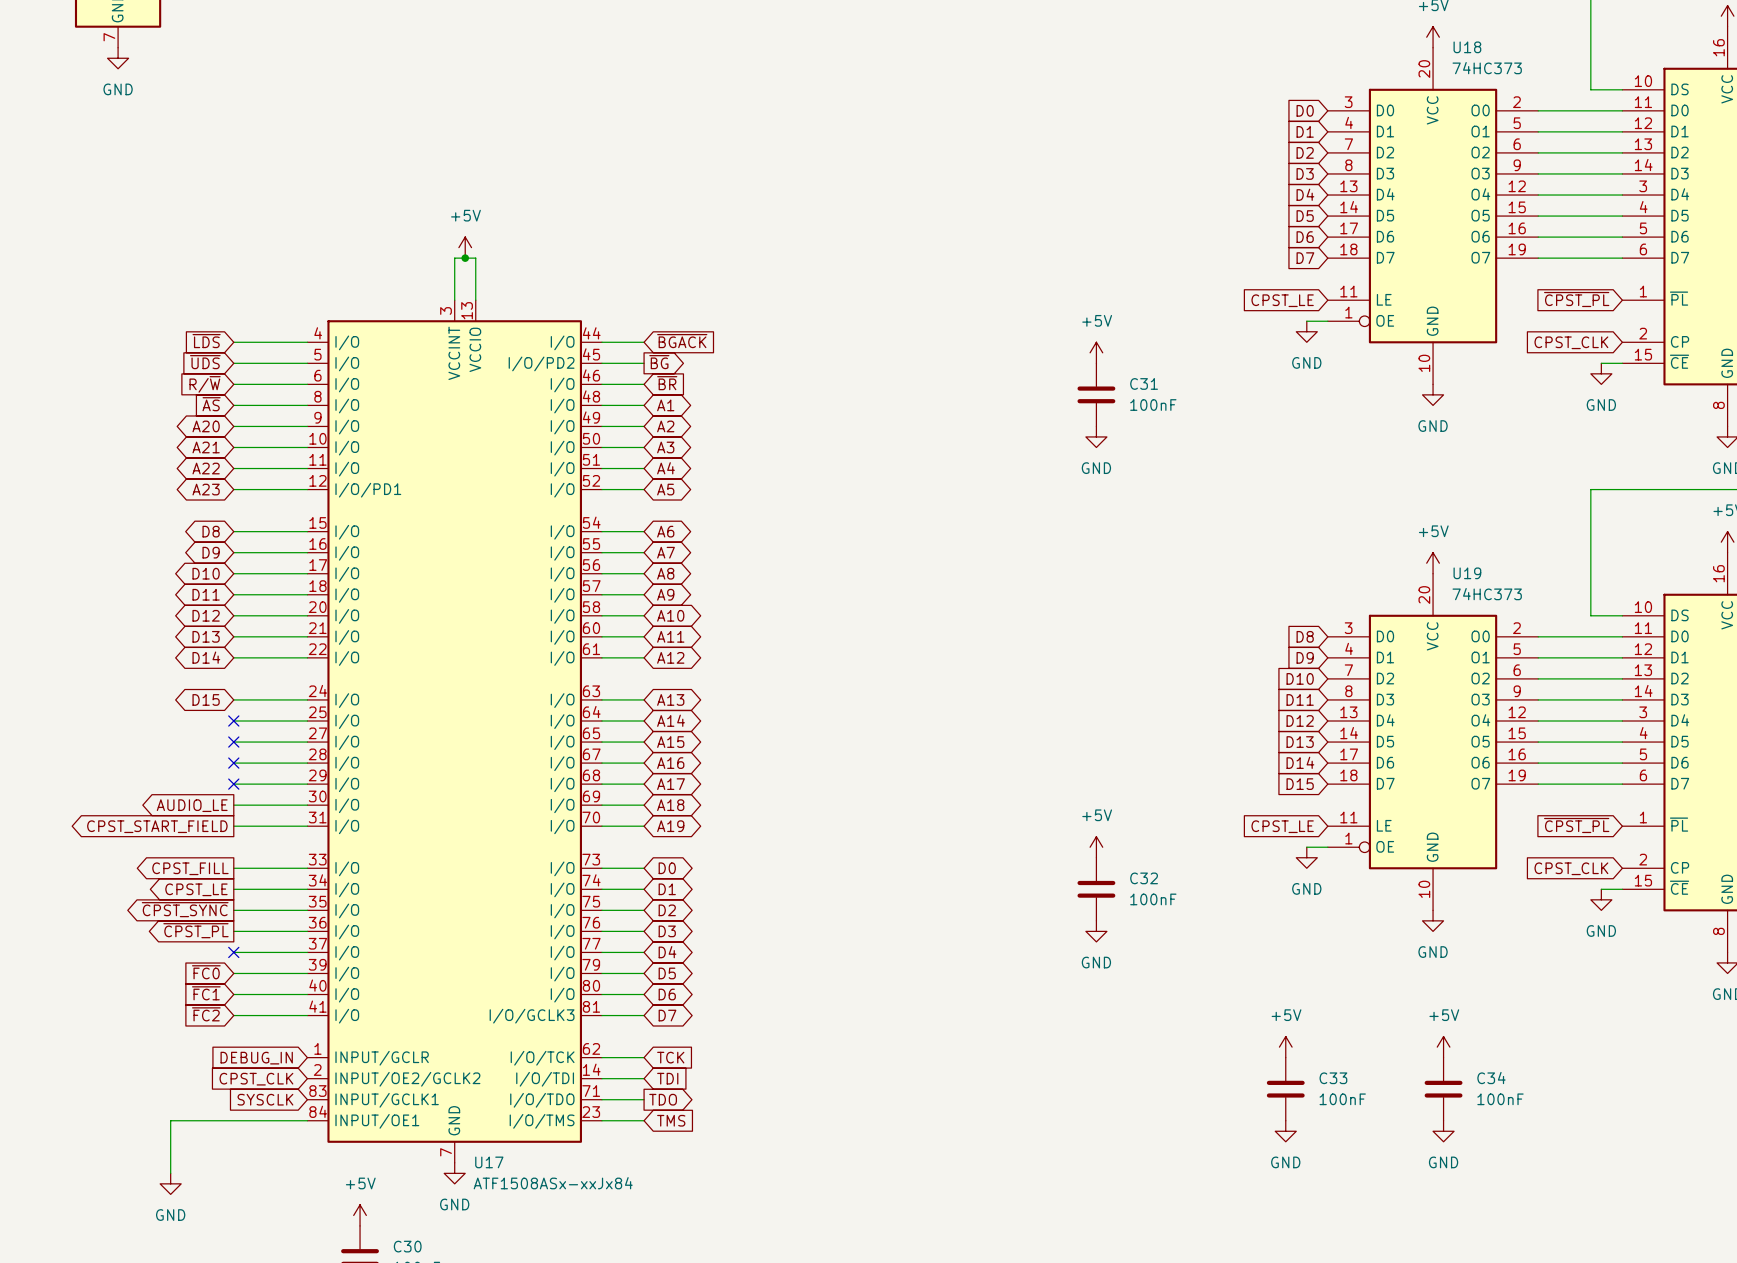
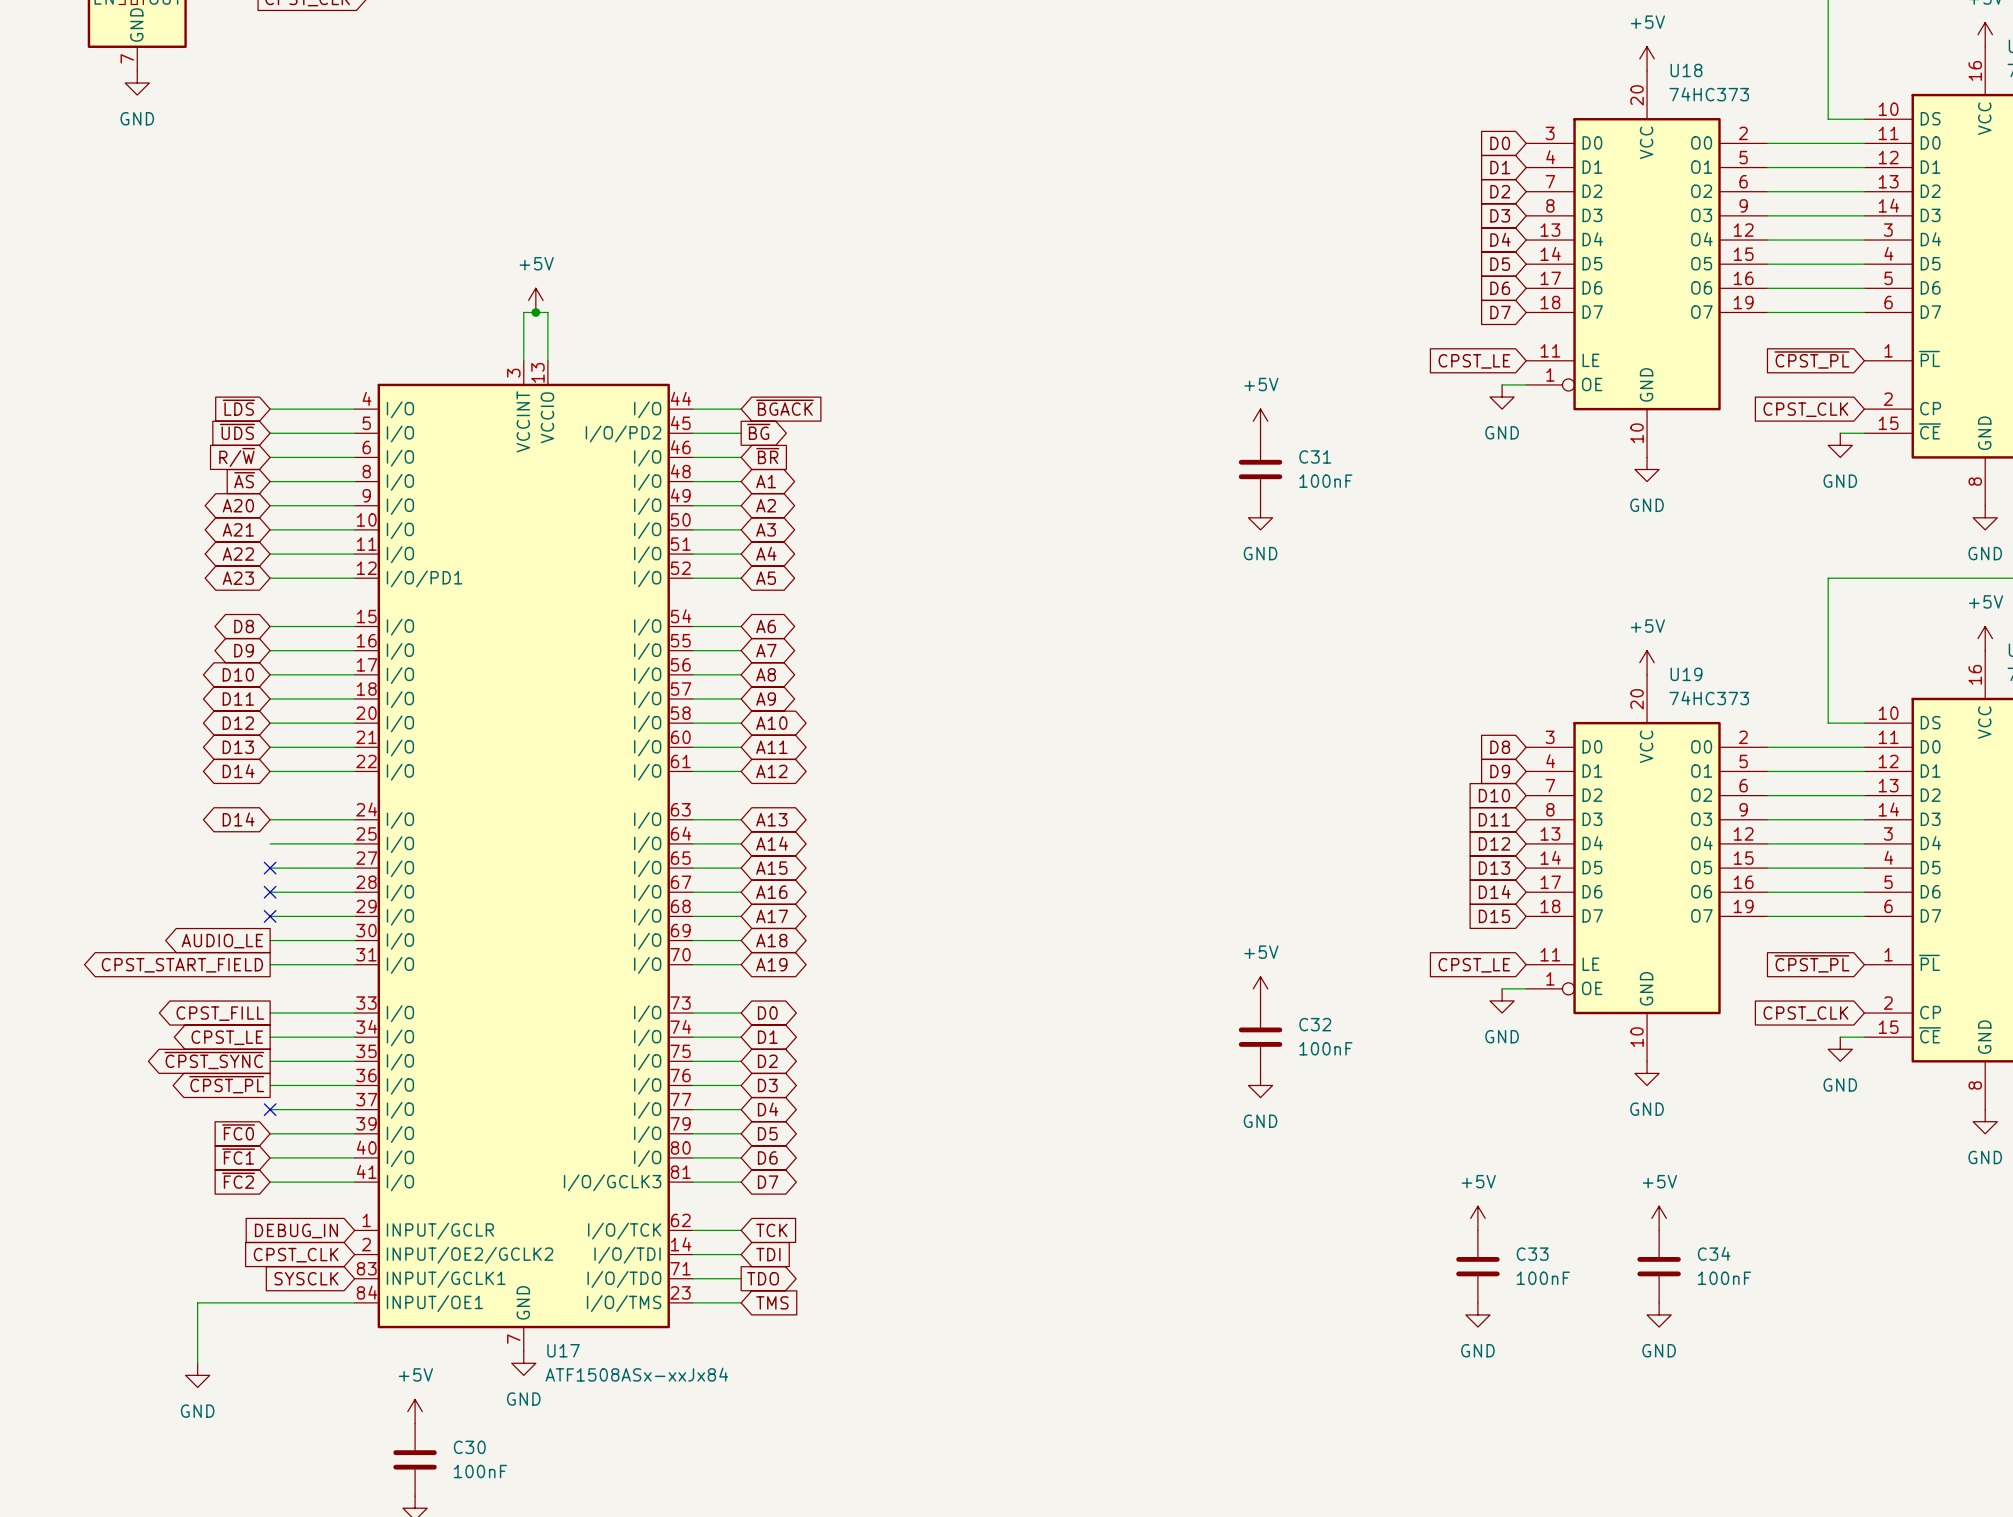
global label: D15 (206, 699) -> D14 (238, 819)
no-connect mark: (233, 720) -> none

